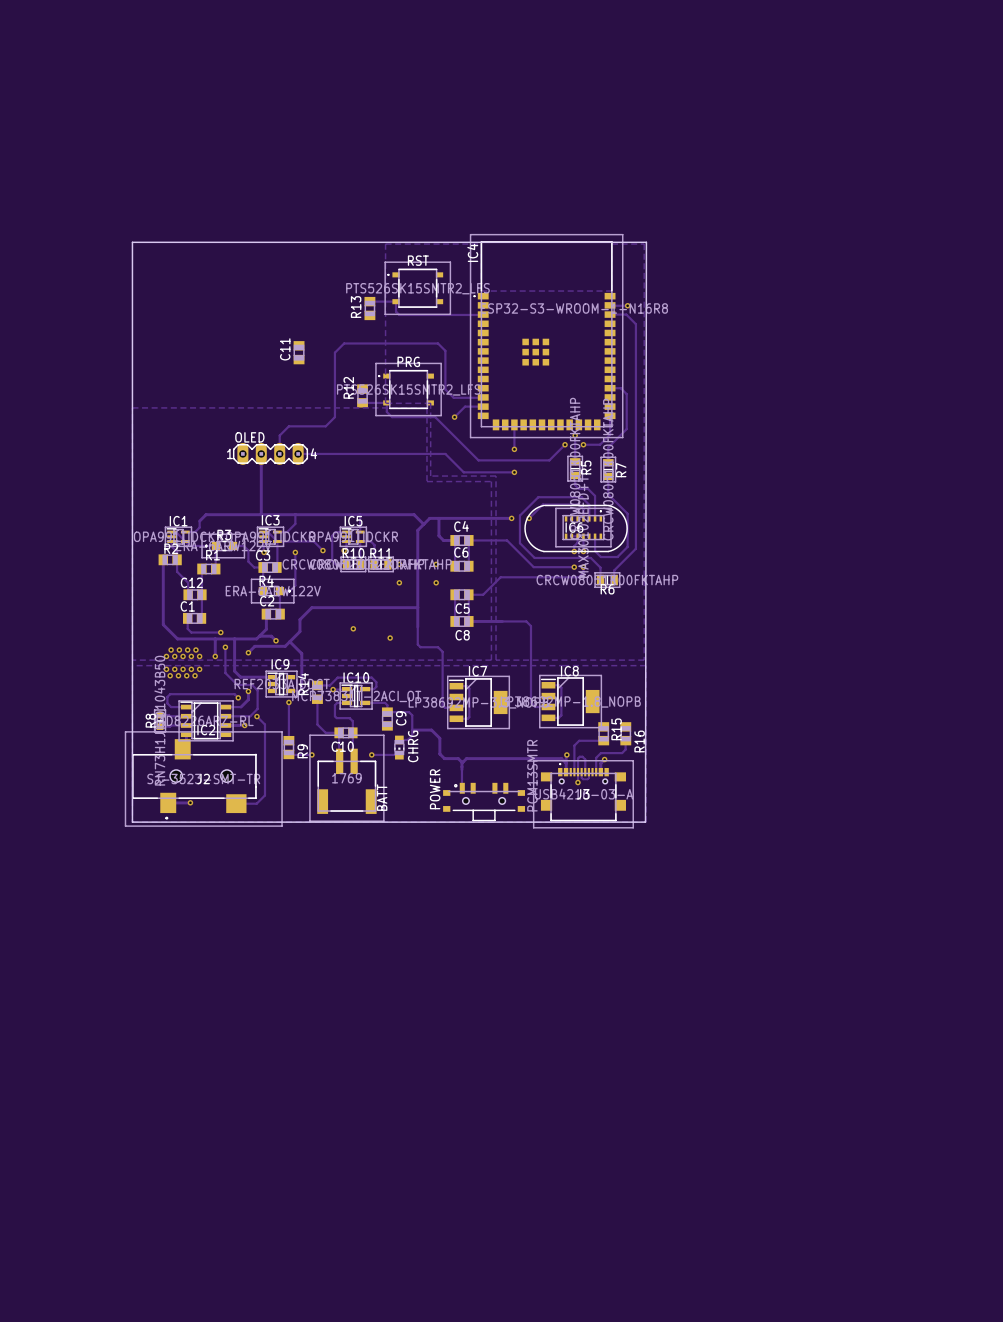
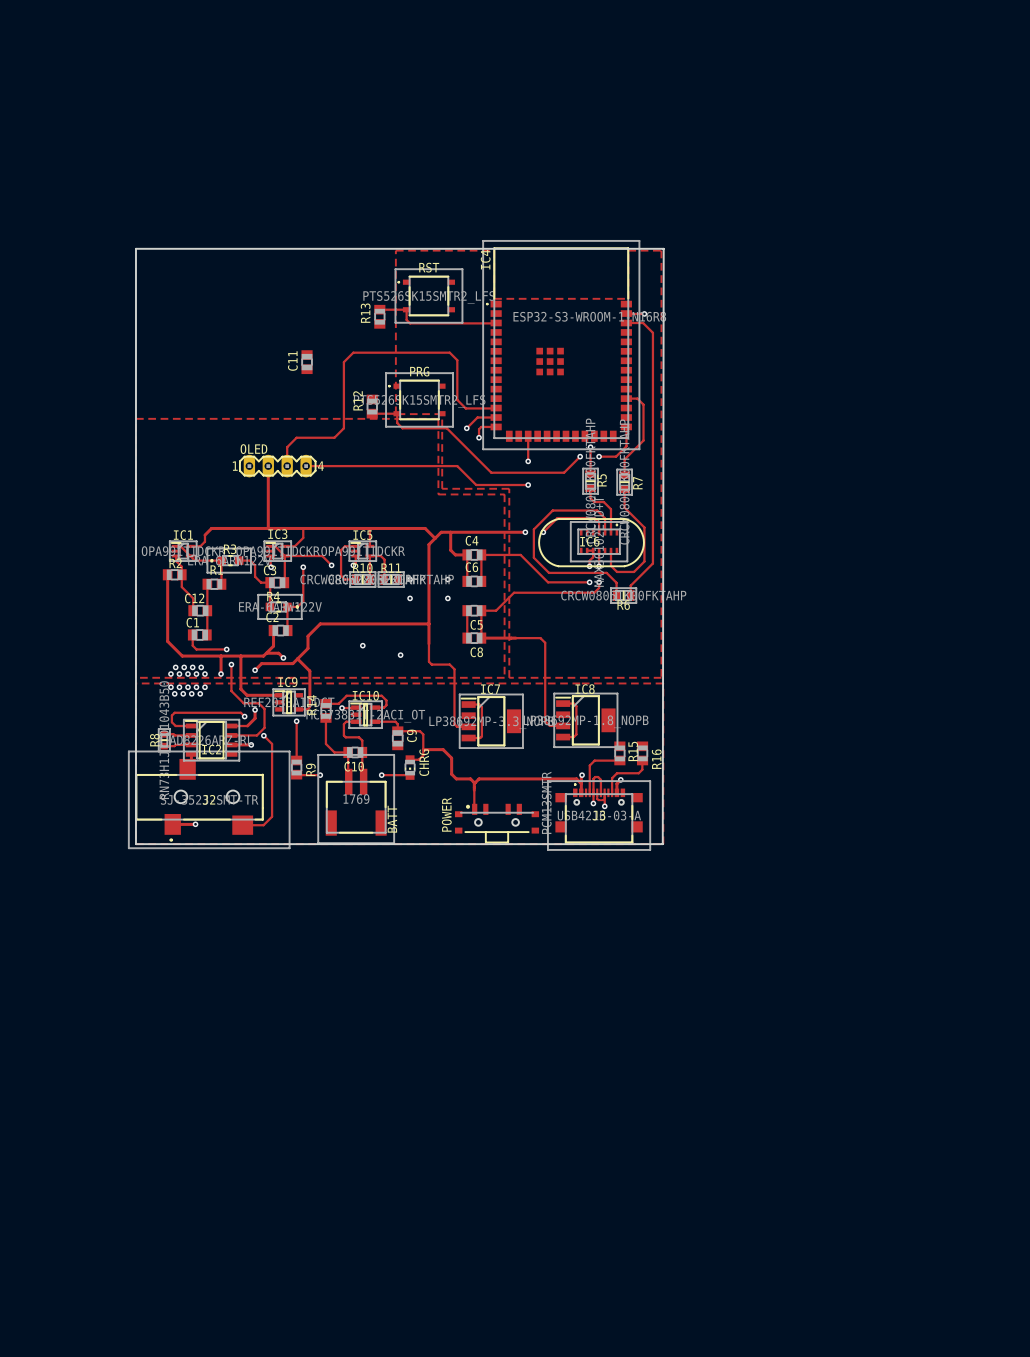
track: none -> (496, 426) (481, 426) (479, 429) (479, 437)
via: none -> (479, 437)
track: none -> (604, 796) (604, 806)
via: none -> (604, 806)

